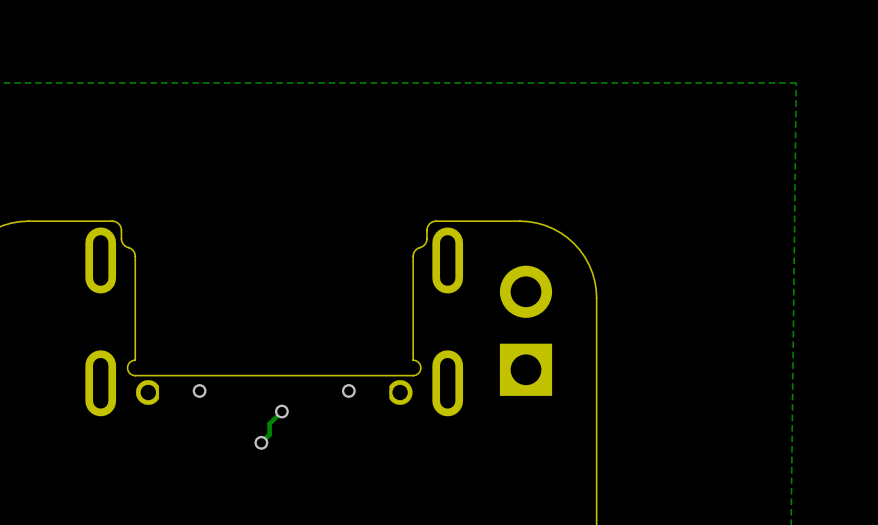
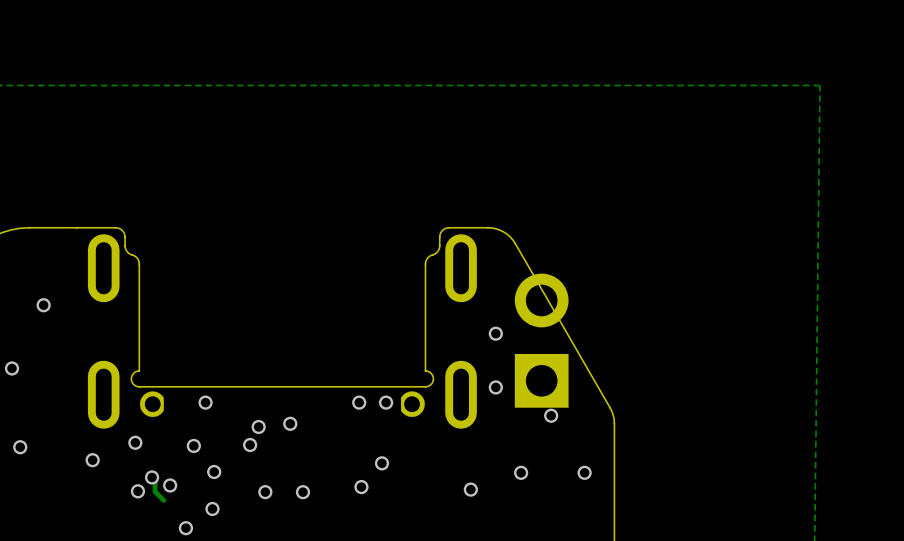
board edge: (473, 221) (528, 221) (545, 225) (567, 237) (584, 257) (592, 272) (596, 289) (596, 411) -> (487, 227) (503, 231) (515, 243) (610, 408) (614, 423)
via: none -> (43, 305)
via: none -> (495, 333)
via: none -> (12, 368)
via: none -> (495, 387)
via: none -> (386, 402)
via: none -> (551, 415)
track: (281, 411) (269, 423) (269, 434) (261, 442) -> none
via: none -> (258, 426)
via: none -> (135, 442)
via: none -> (250, 445)
via: none -> (193, 445)
via: none -> (20, 447)
via: (261, 442) -> none
via: none -> (92, 460)
via: none -> (382, 463)
via: none -> (214, 471)
via: none -> (521, 472)
via: none -> (584, 472)
track: none -> (152, 477) (155, 478) (155, 491) (163, 500)
via: none -> (152, 477)
via: none -> (170, 485)
via: none -> (361, 487)
via: none -> (470, 489)
via: none -> (137, 491)
via: none -> (265, 492)
via: none -> (303, 492)
via: none -> (212, 508)
via: none -> (185, 528)

